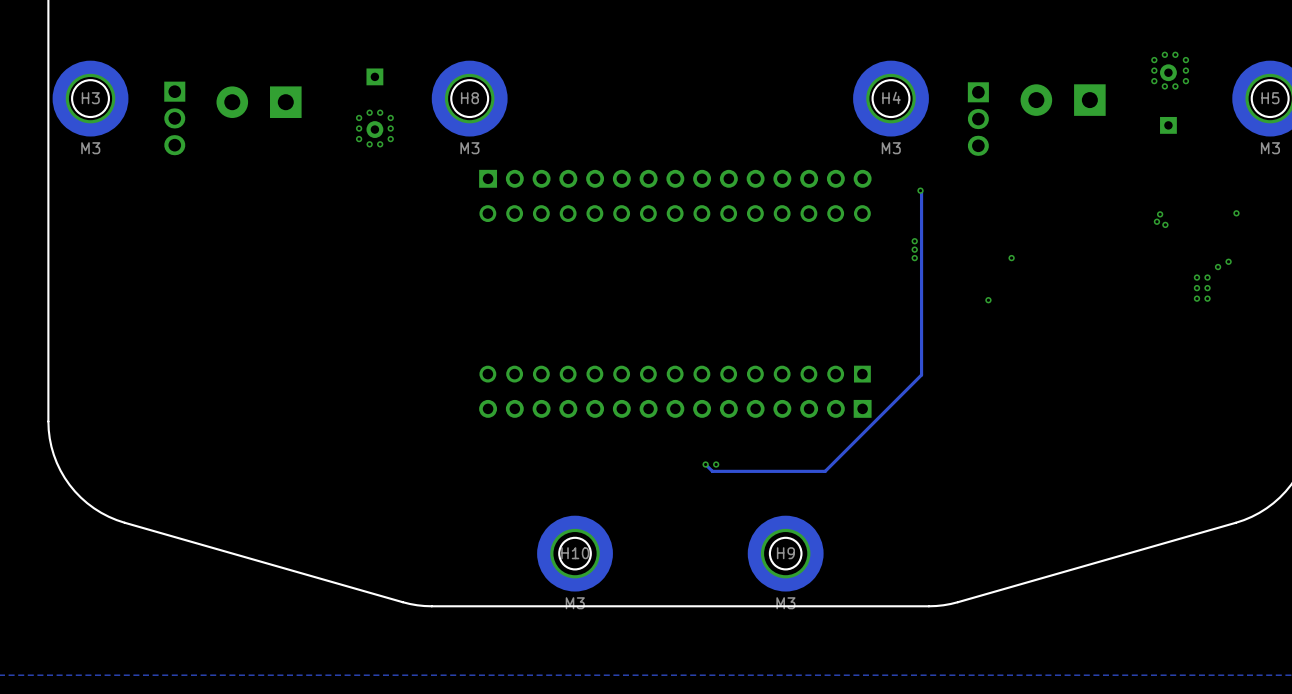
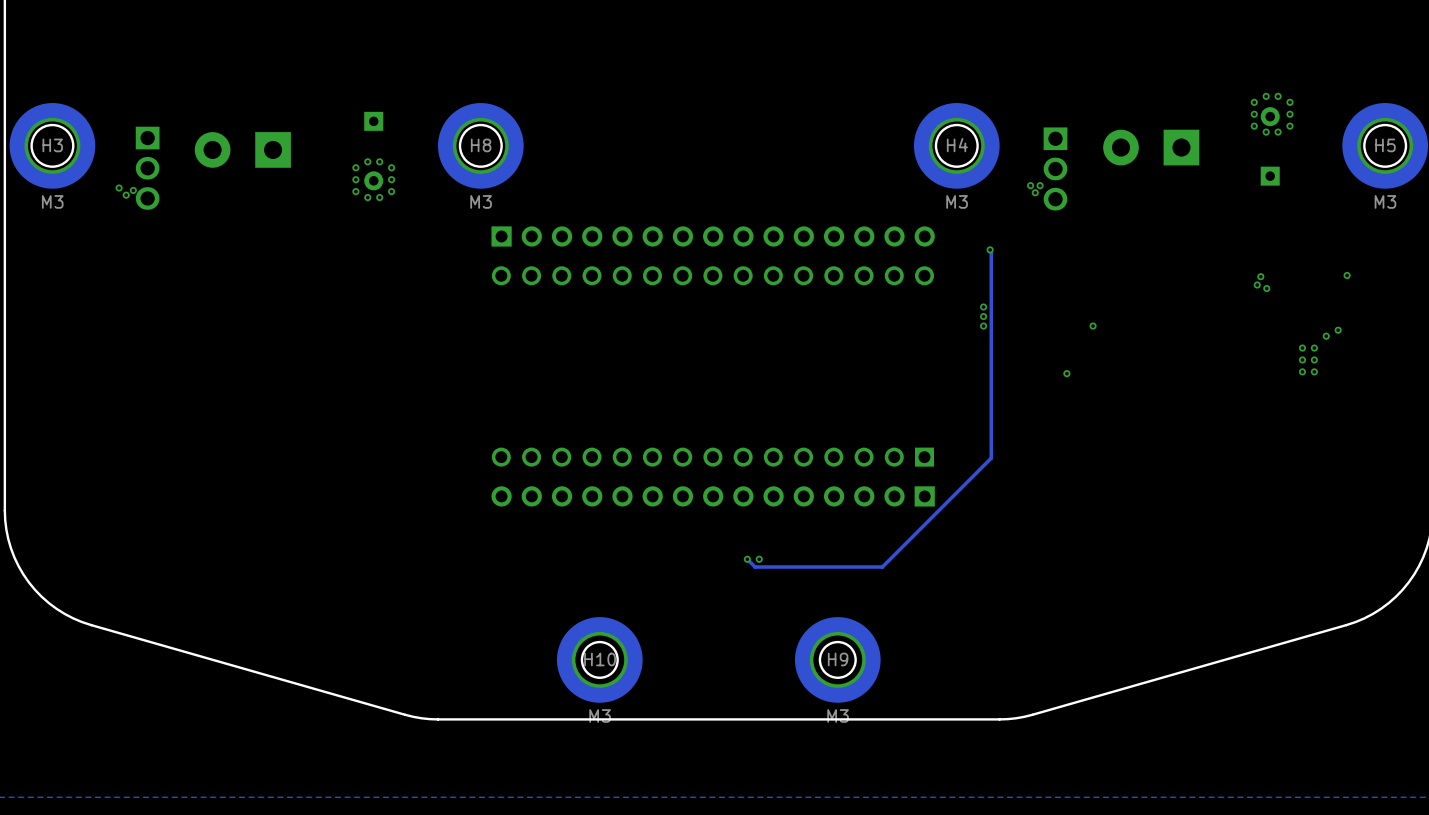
via: none -> (1030, 185)
via: none -> (1040, 185)
via: none -> (119, 188)
via: none -> (133, 190)
via: none -> (1035, 192)
via: none -> (126, 195)

